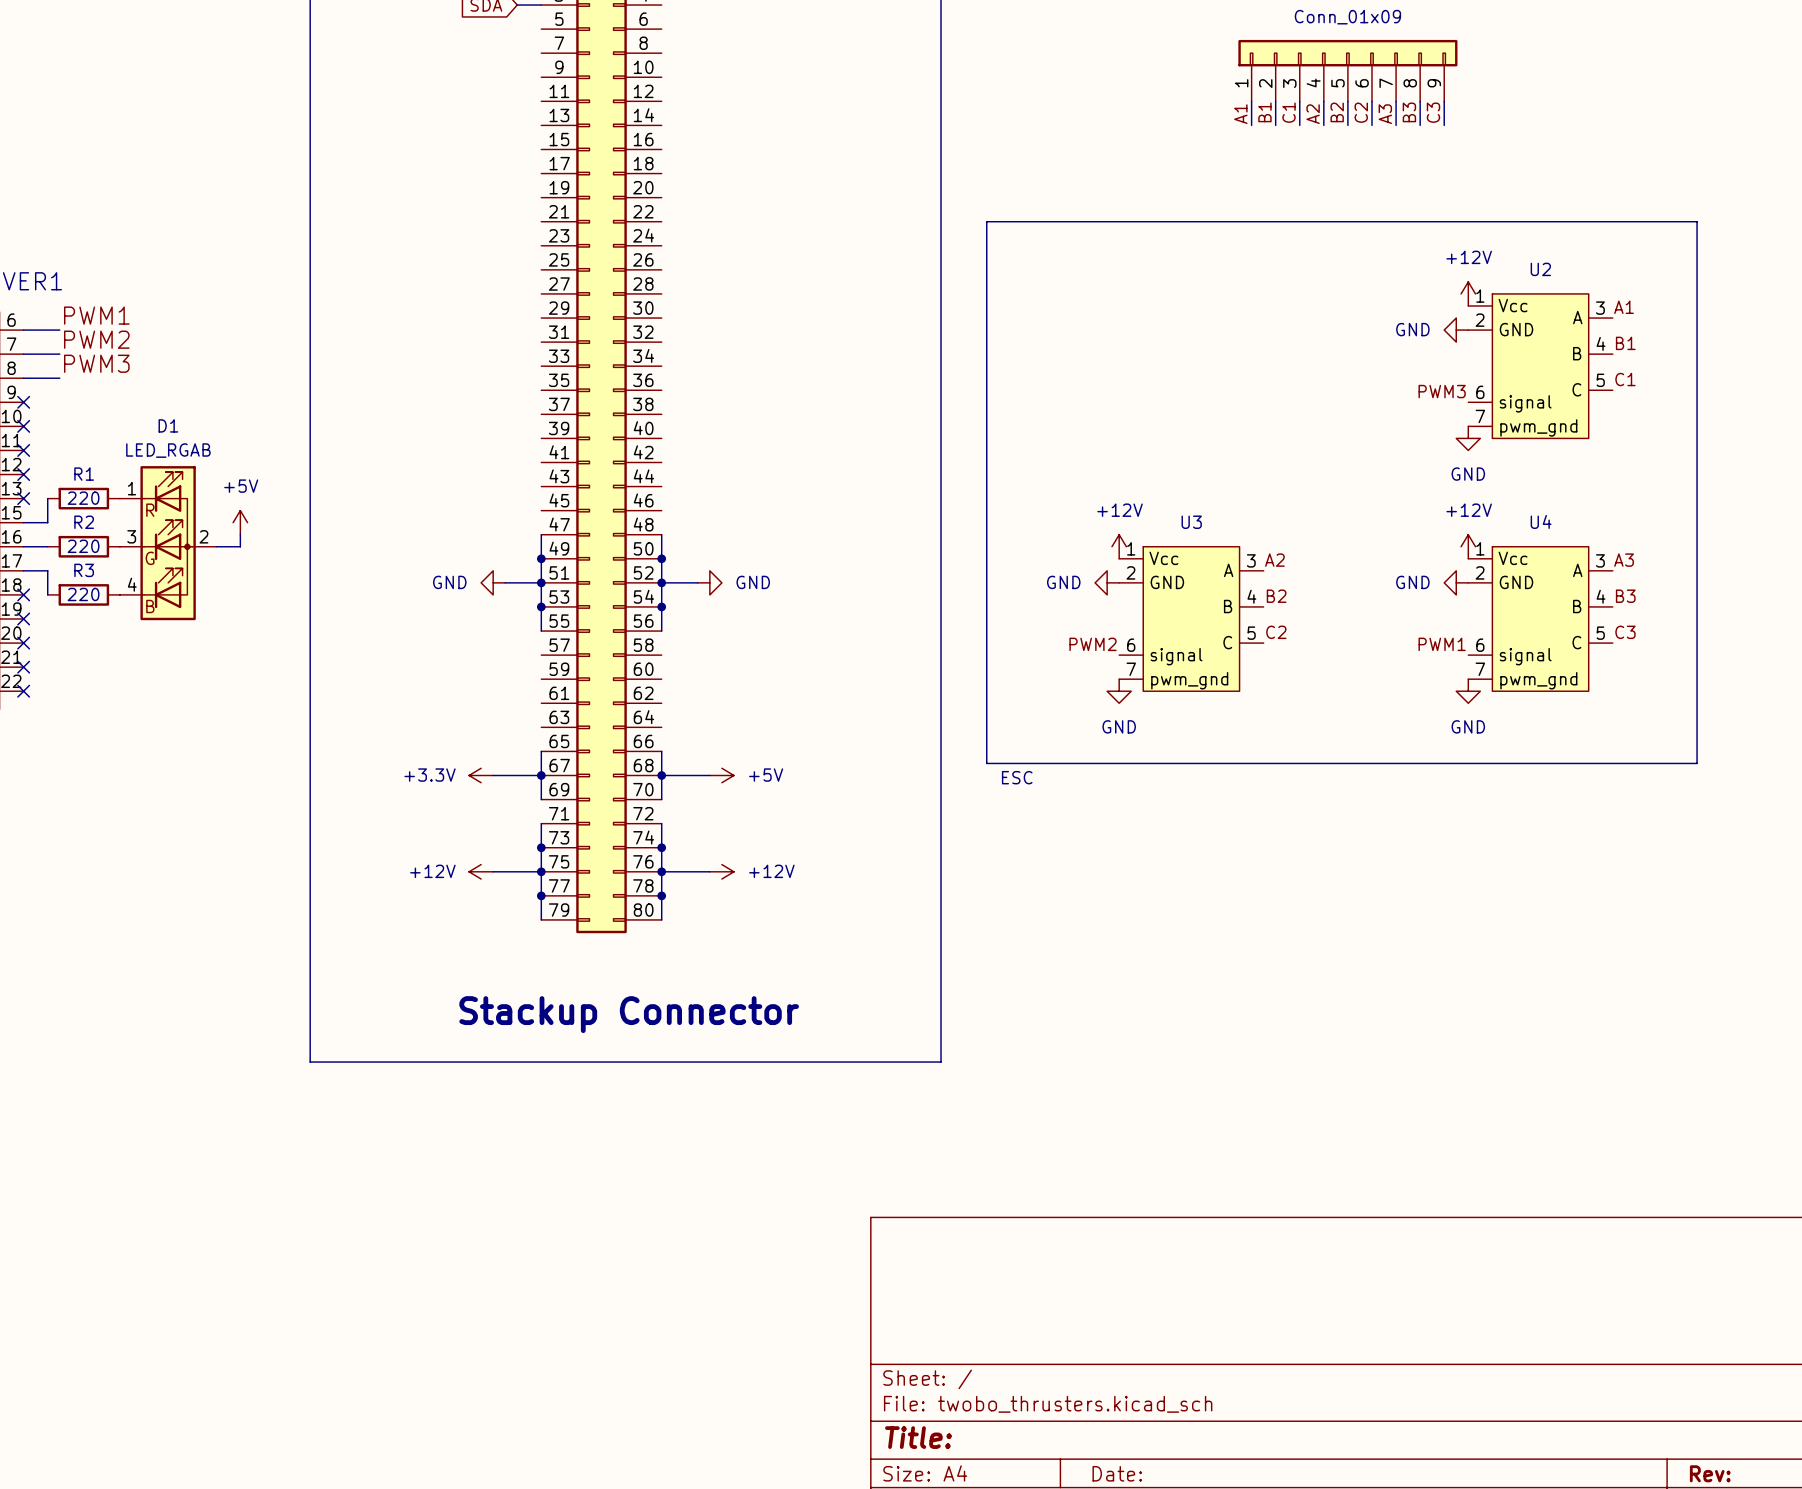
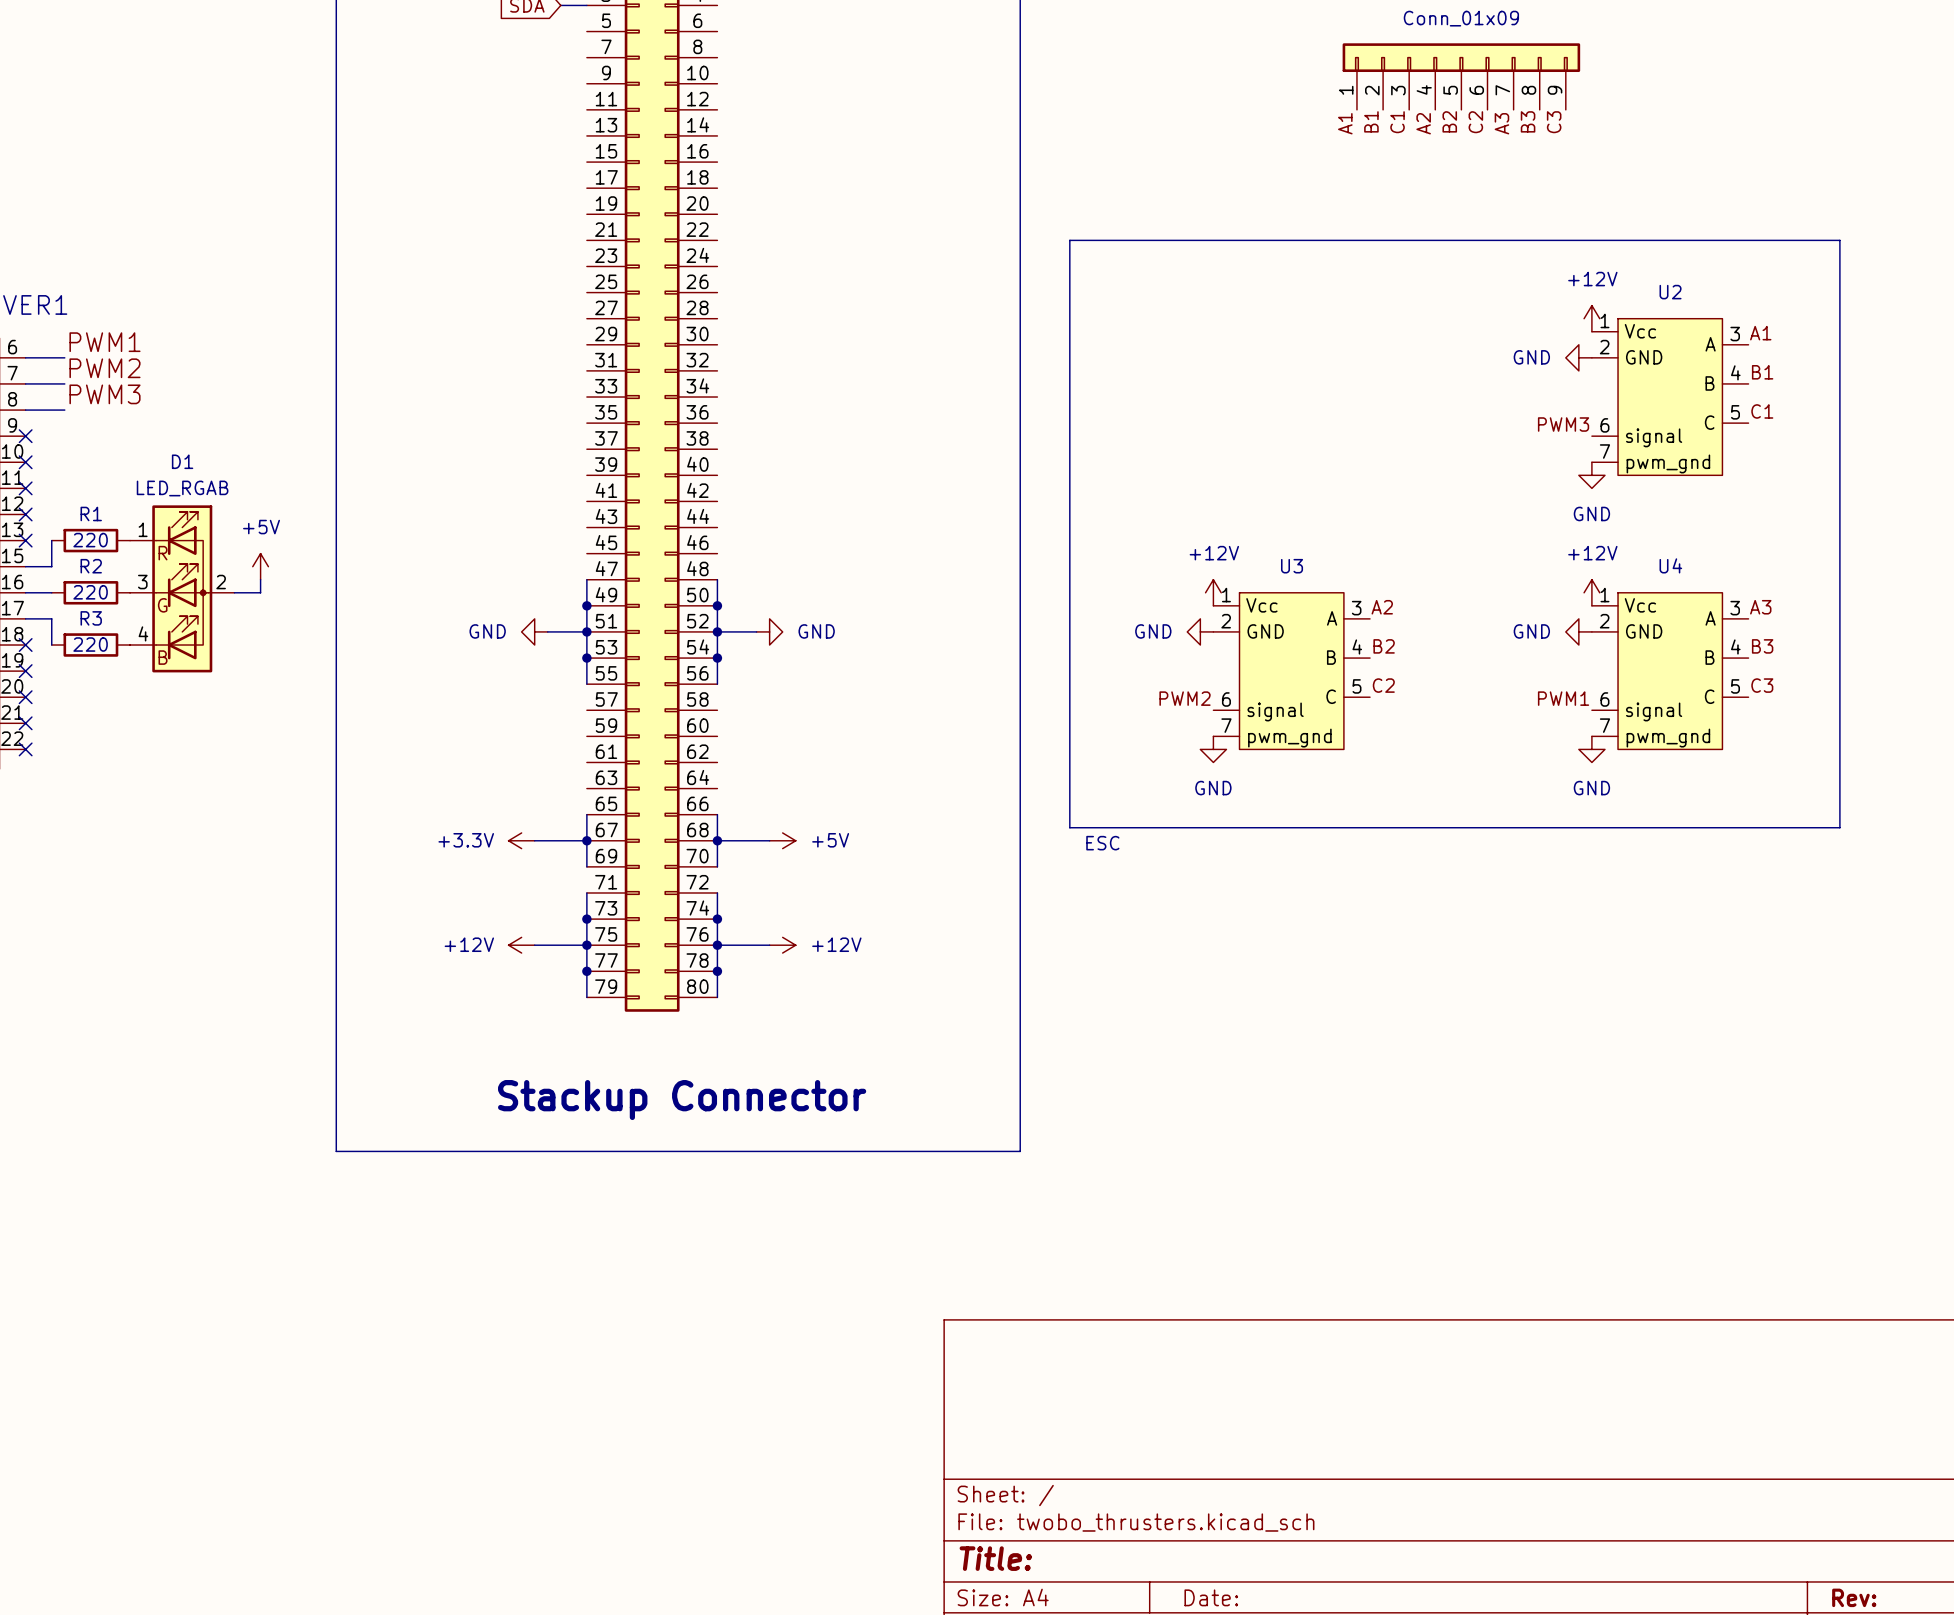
wire: (1251, 101) (1251, 125) -> none
wire: (1275, 101) (1275, 125) -> none
wire: (1299, 101) (1299, 125) -> none
wire: (1323, 101) (1323, 125) -> none
wire: (1347, 101) (1347, 125) -> none
wire: (1371, 101) (1371, 125) -> none
wire: (1396, 101) (1396, 125) -> none
wire: (1420, 101) (1420, 125) -> none
wire: (1444, 101) (1444, 125) -> none

